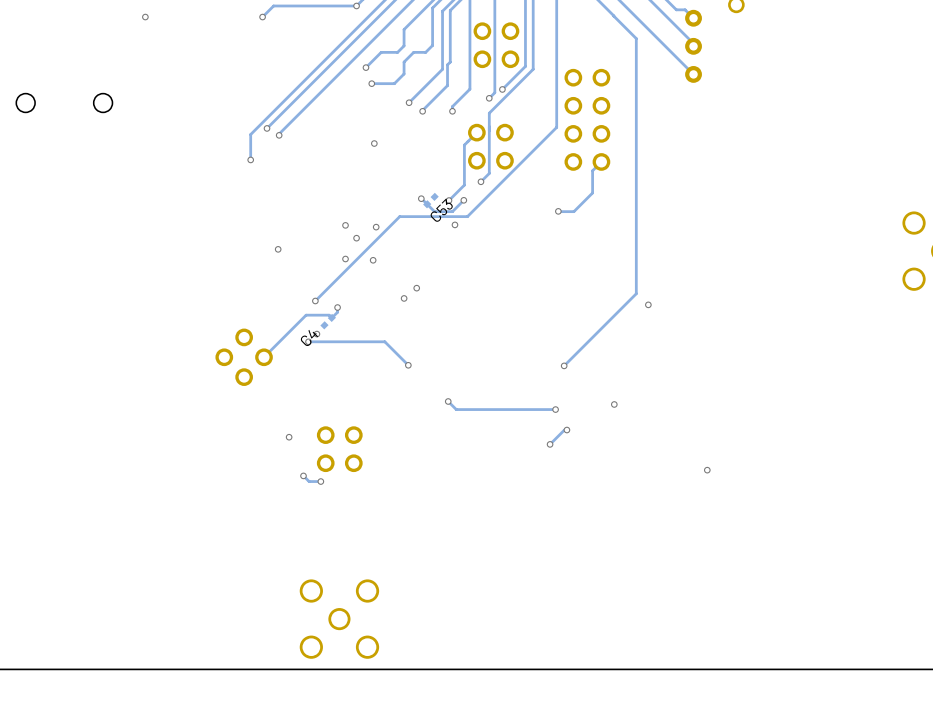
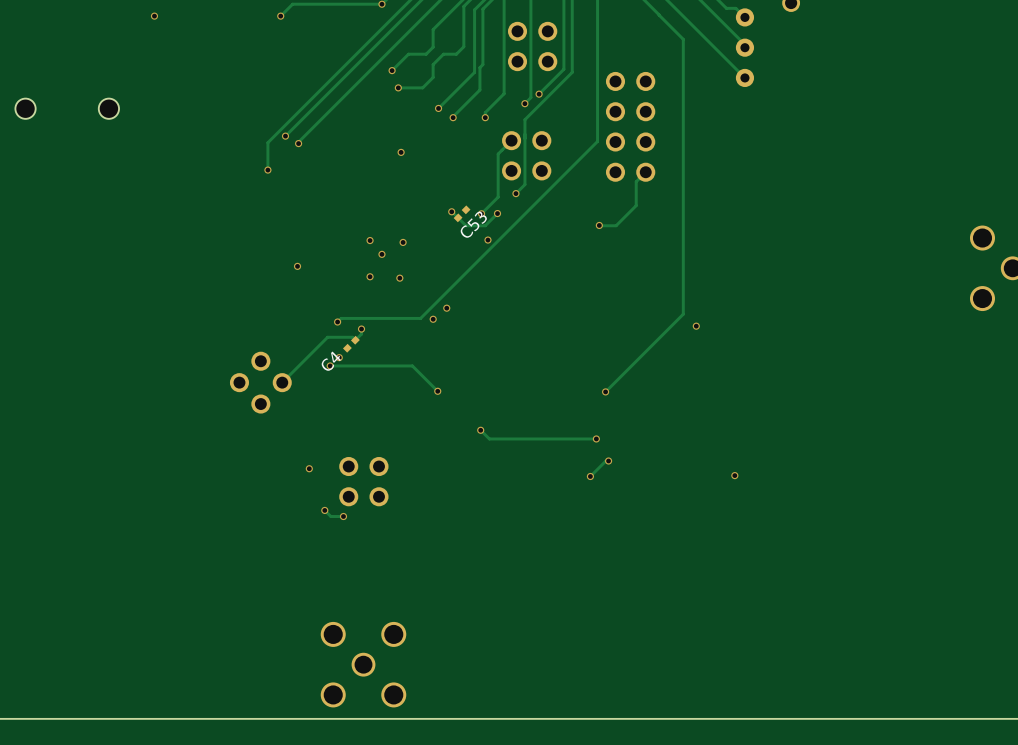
track: (556, 127) (467, 216) (399, 216) (318, 297) -> (597, 134) (597, 141) (420, 318) (341, 318)
via: (614, 404) -> none
via position: (707, 470) -> (734, 475)

